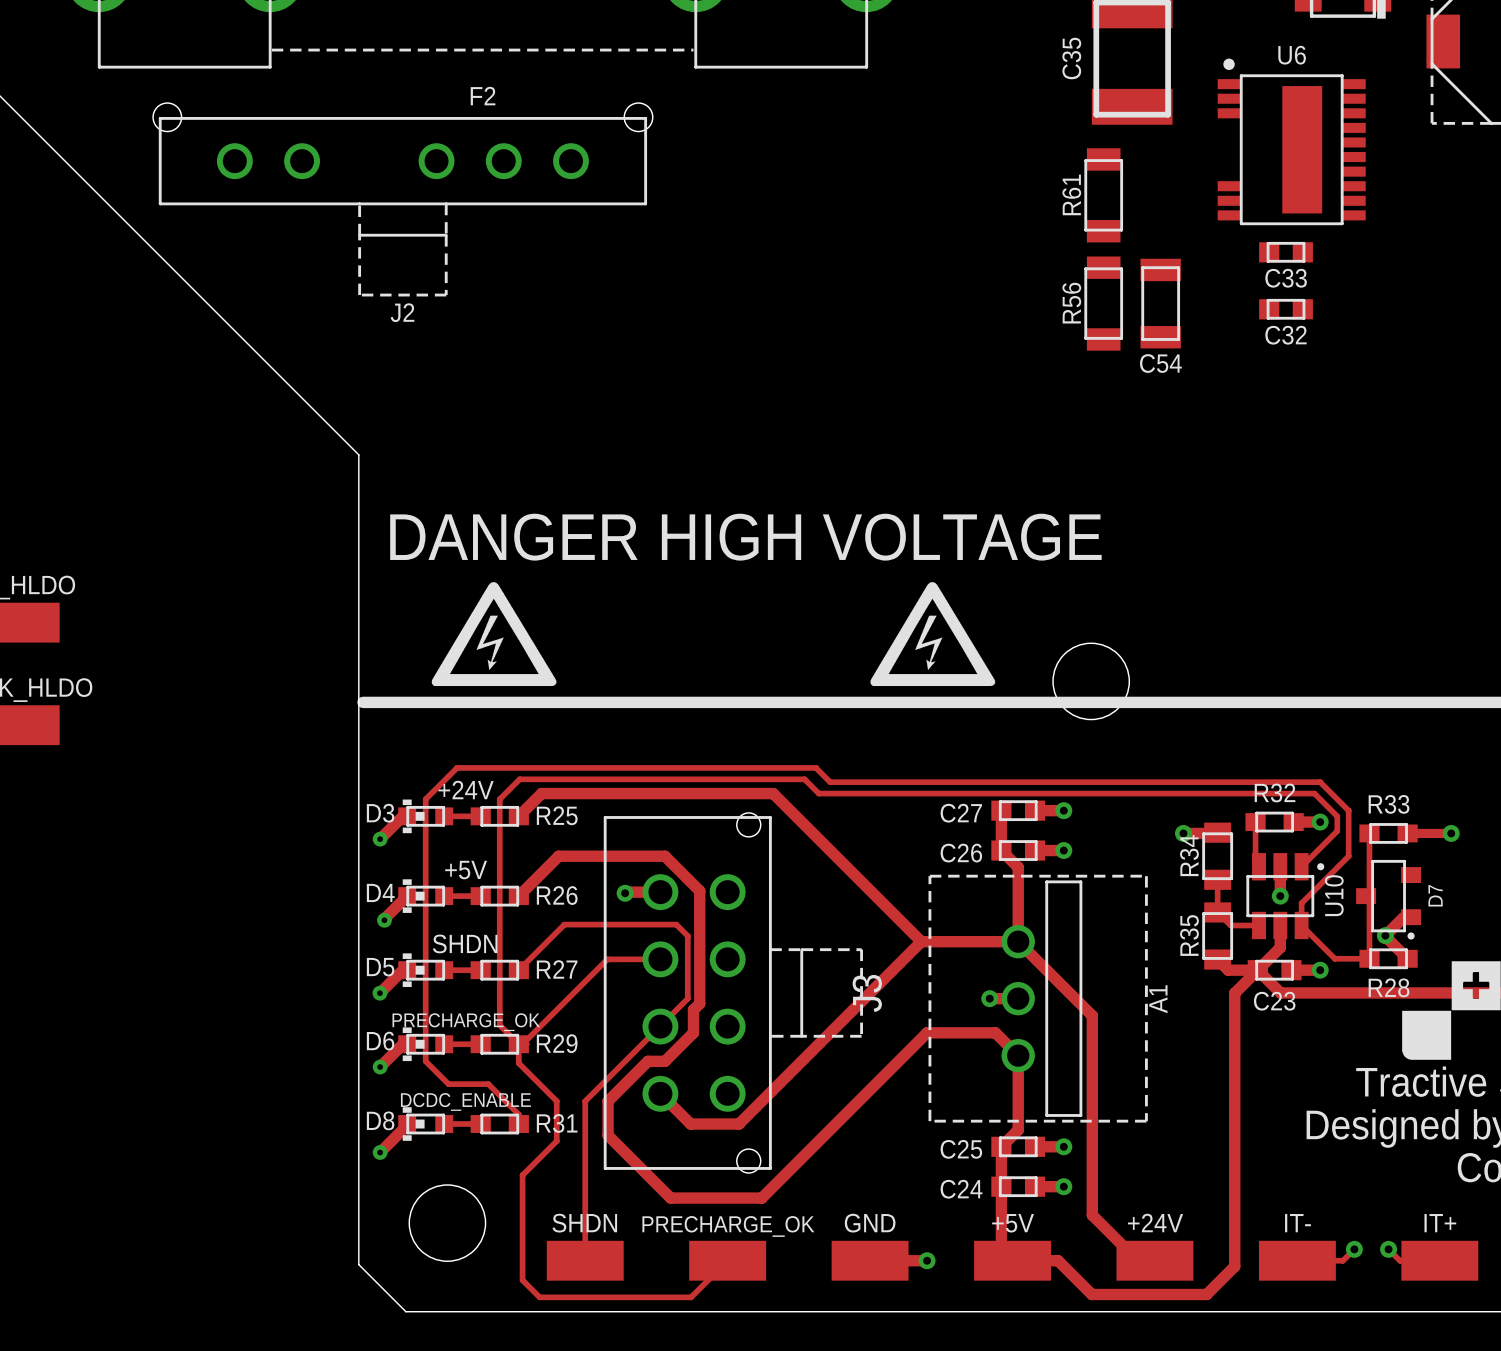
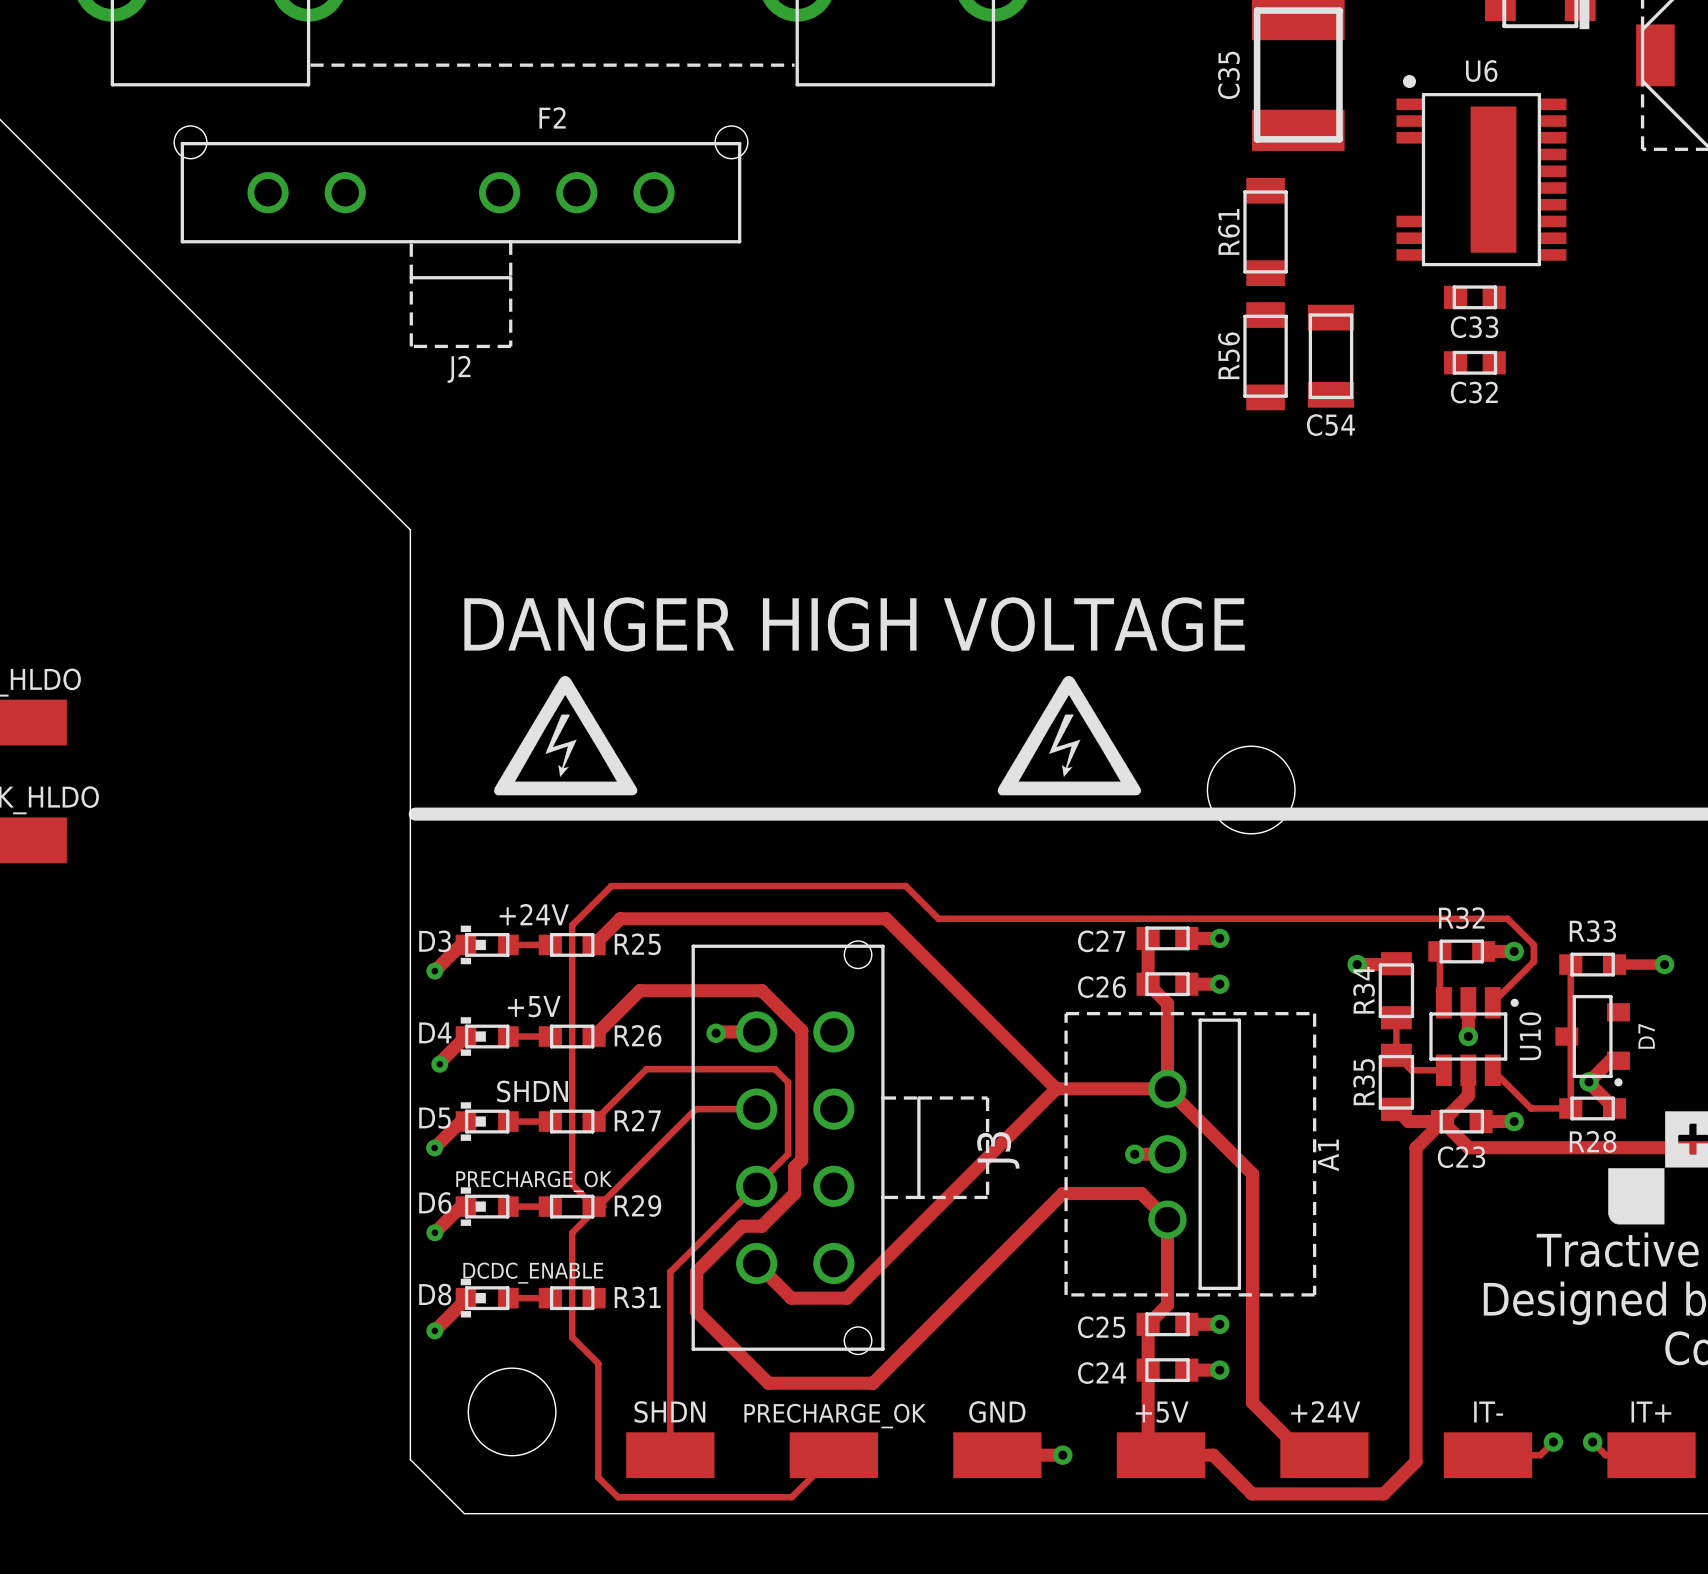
track: (519, 779) (804, 779) -> (595, 902) (611, 886) (905, 886) (922, 902)
track: (1301, 925) (1301, 903) (1348, 856) (1348, 810) (1320, 782) (830, 782) (815, 767) (457, 767) (425, 799) (425, 1061) (448, 1084) (488, 1084) (518, 1114) (518, 1124) -> none
track: (518, 1044) (518, 1063) (556, 1101) (556, 1141) (522, 1175) (522, 1180) -> (598, 1206) (572, 1232) (572, 1337) (598, 1363)

